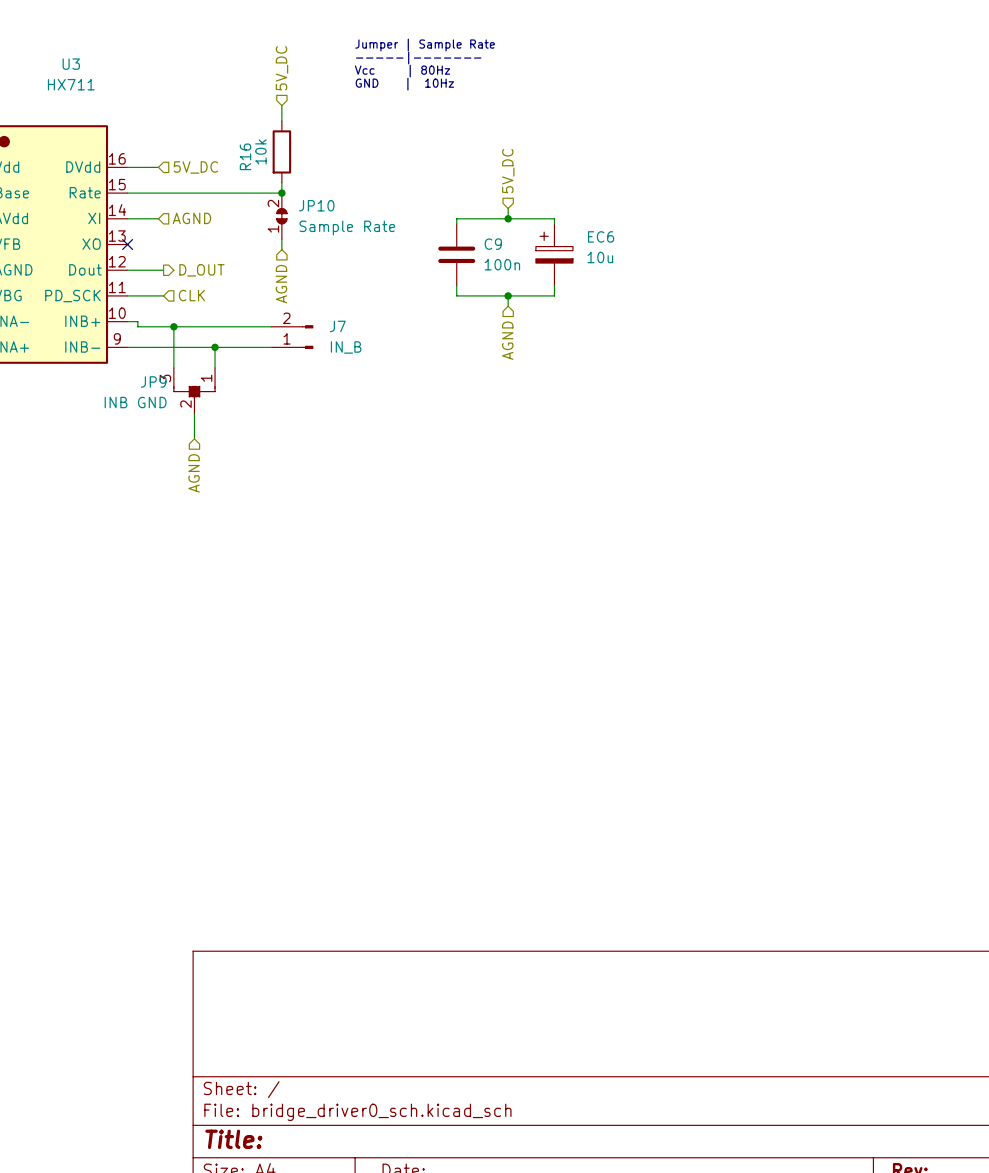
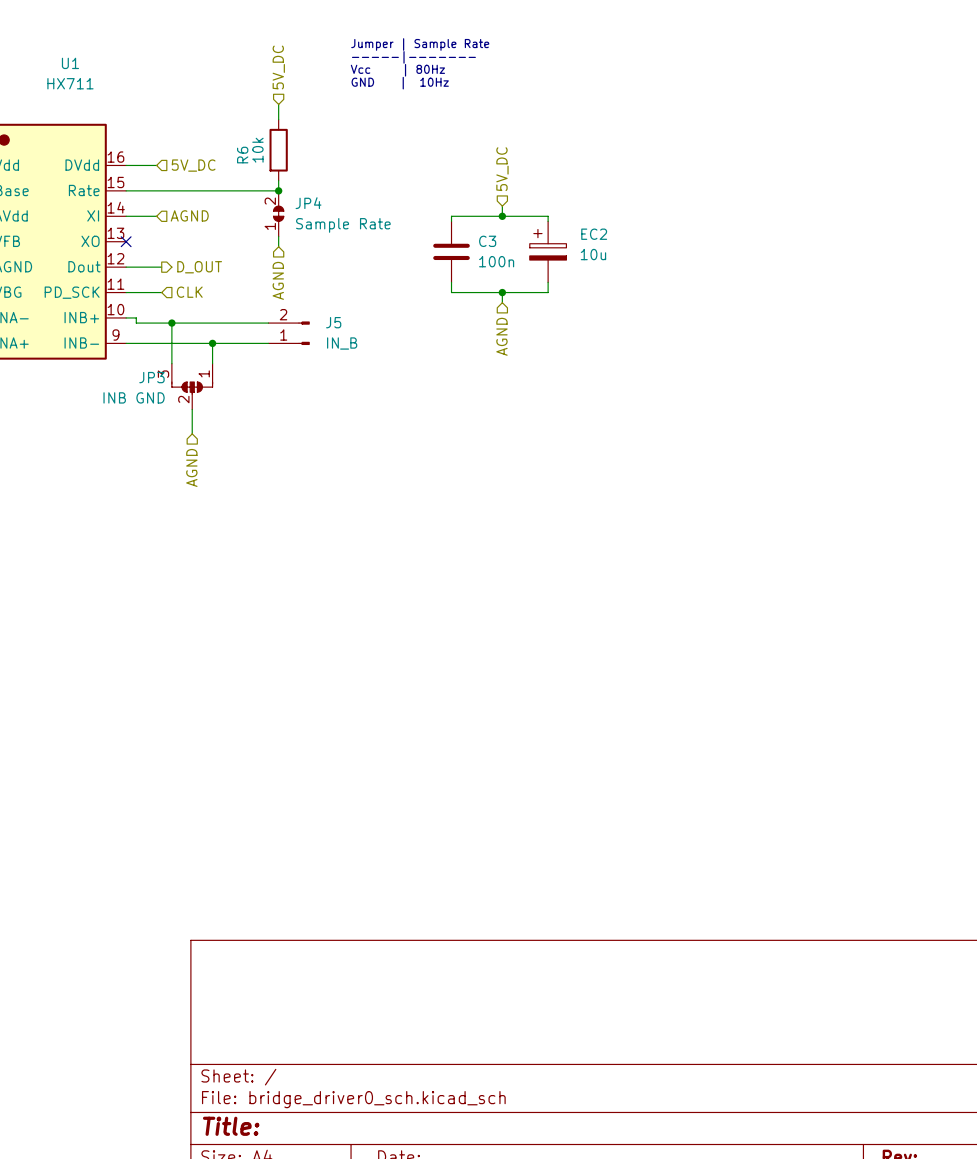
U3 name: U3 (71, 64) -> U1 (70, 63)
R16 name: R16 (245, 156) -> R6 (242, 155)
JP10 name: JP10 (316, 205) -> JP4 (308, 203)
EC6 name: EC6 (601, 236) -> EC2 (594, 234)
C9 name: C9 (493, 244) -> C3 (487, 241)
J7 name: J7 (337, 326) -> J5 (333, 322)
JP9: INB GND (194, 391) -> none
JP3: none -> INB GND (192, 386)

